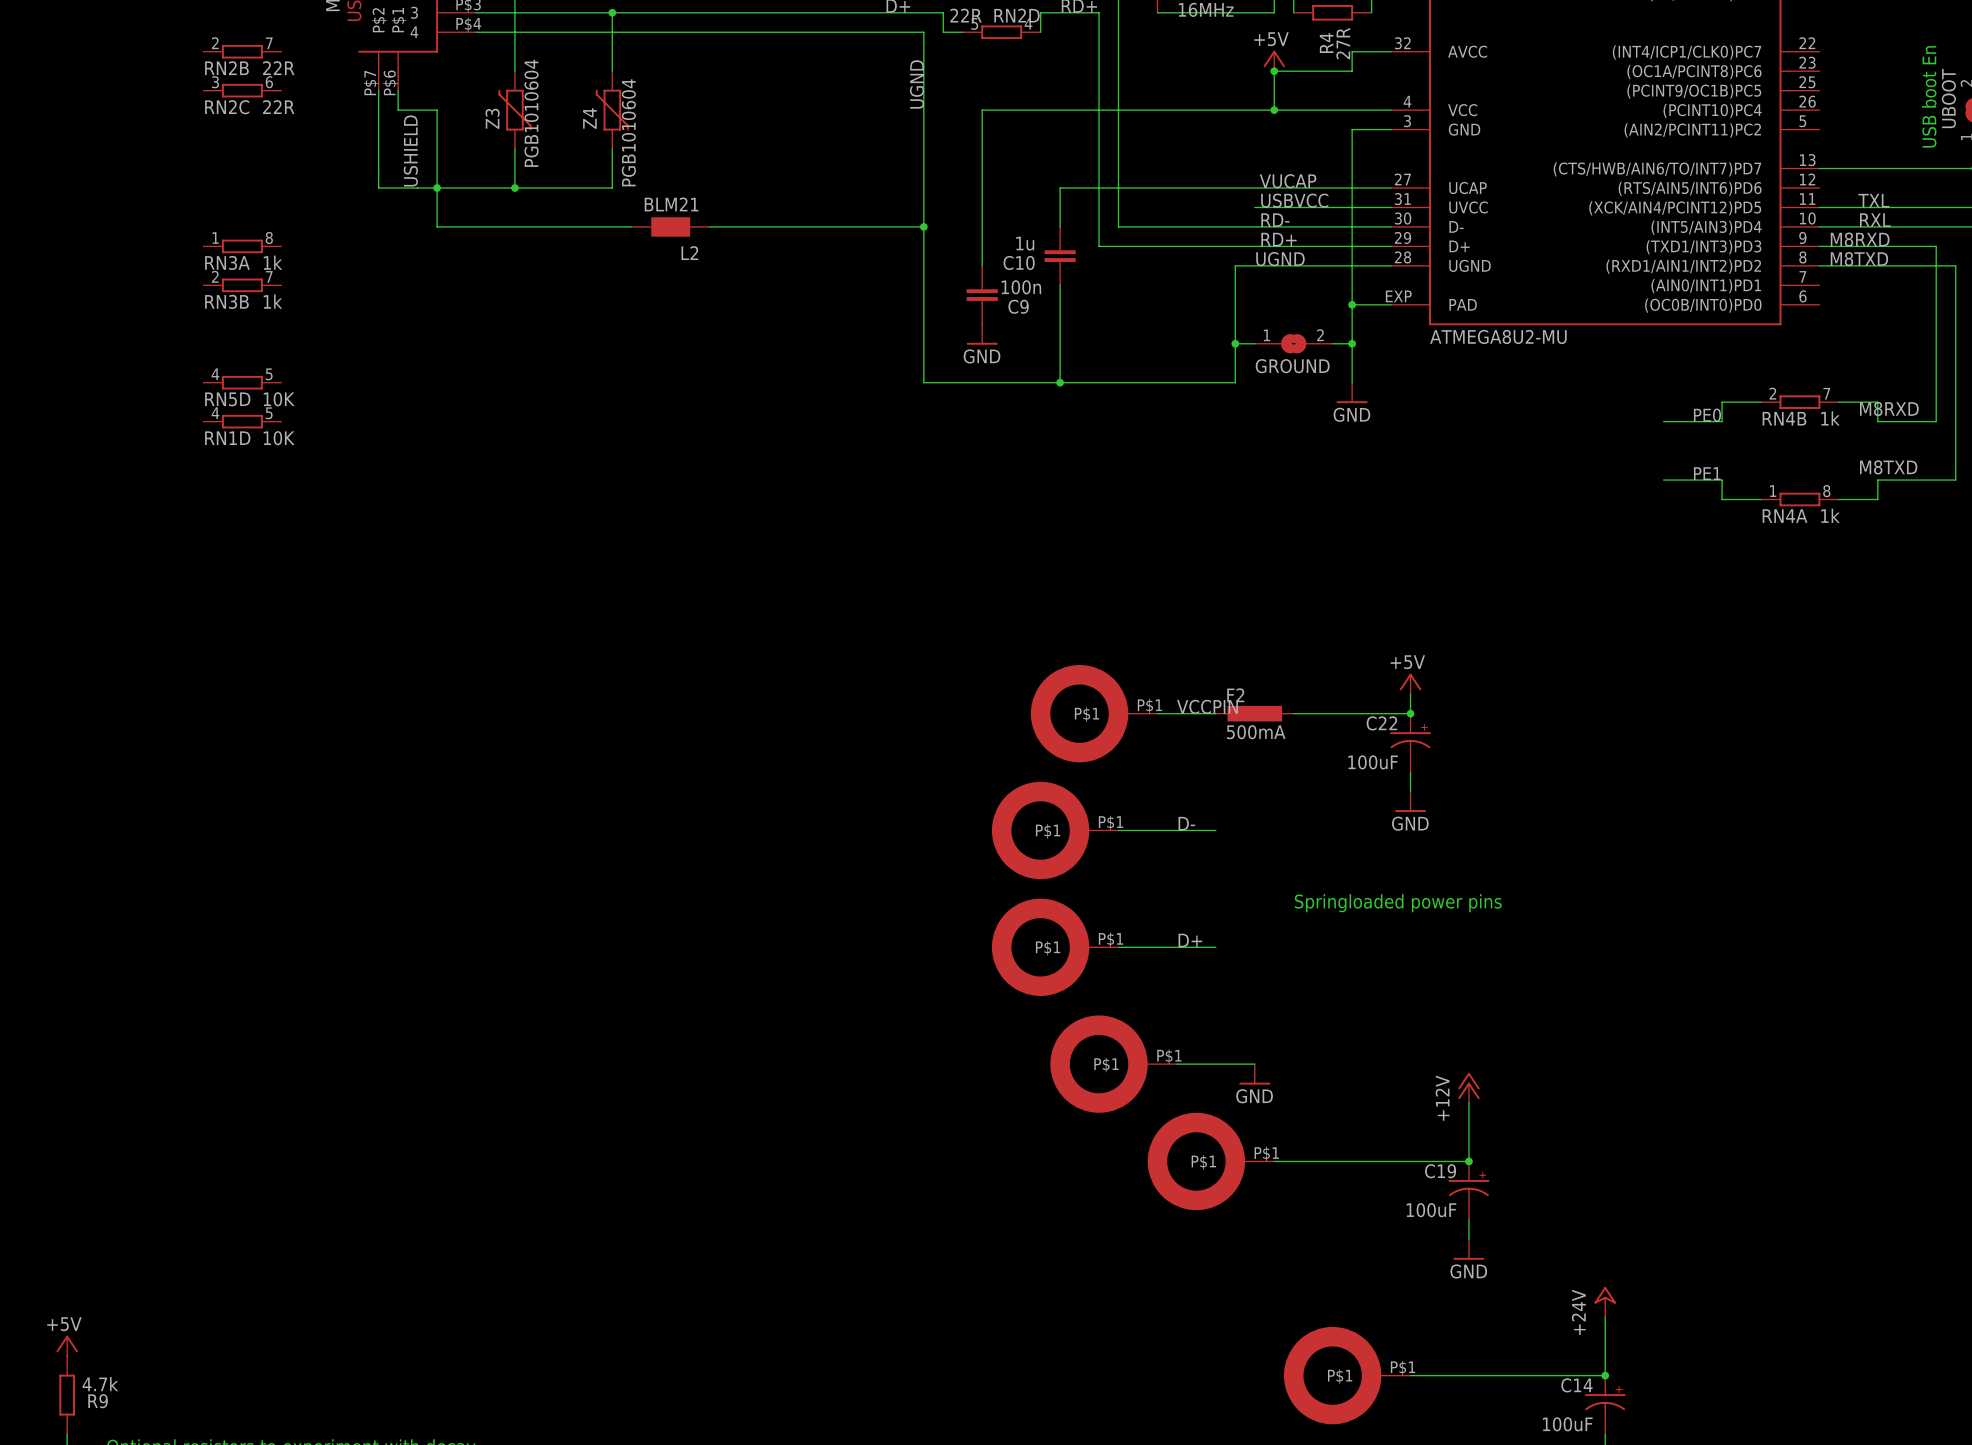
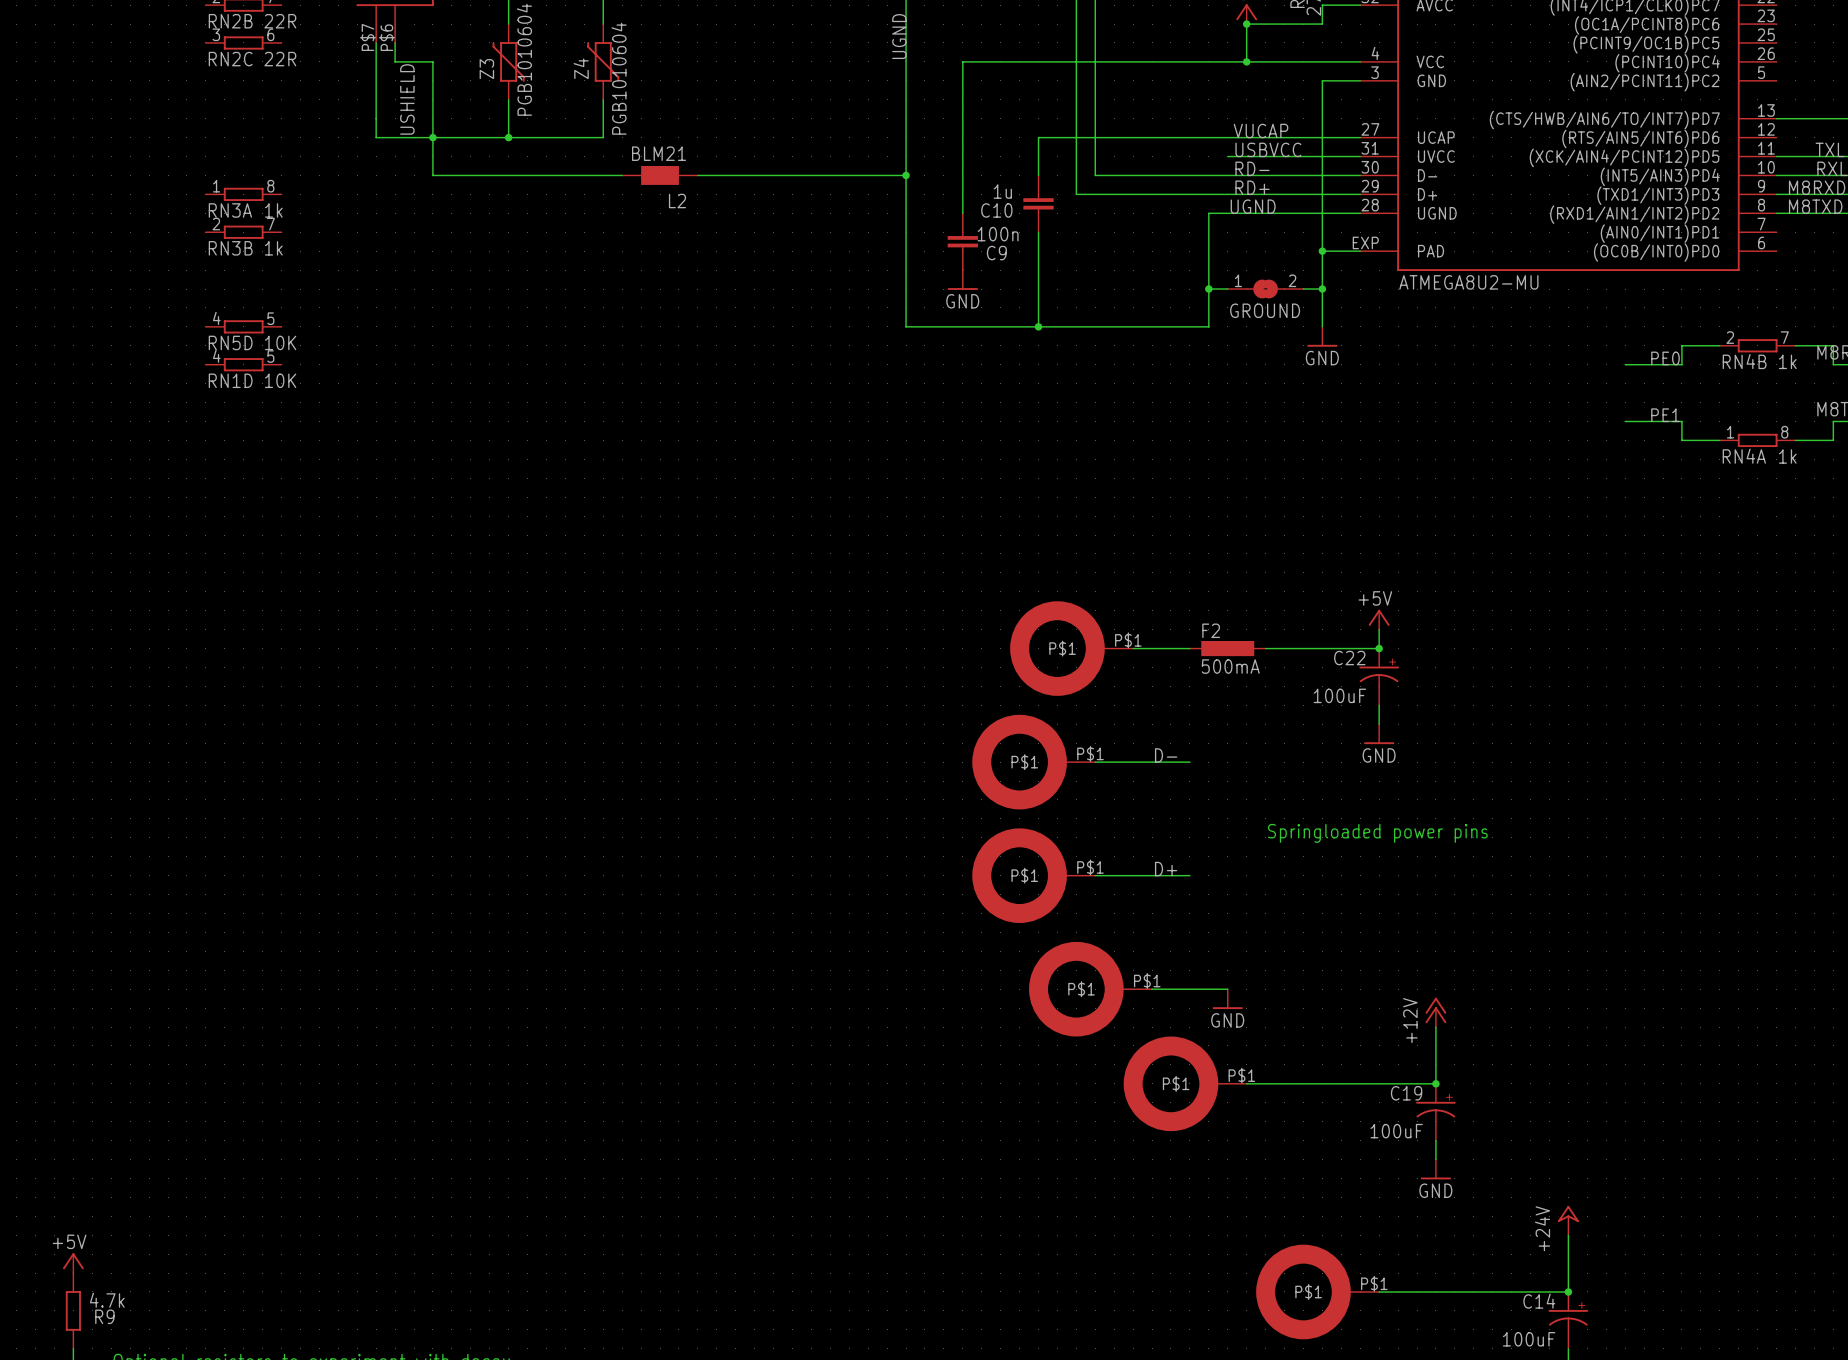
label: VCCPIN (1207, 706) -> none

